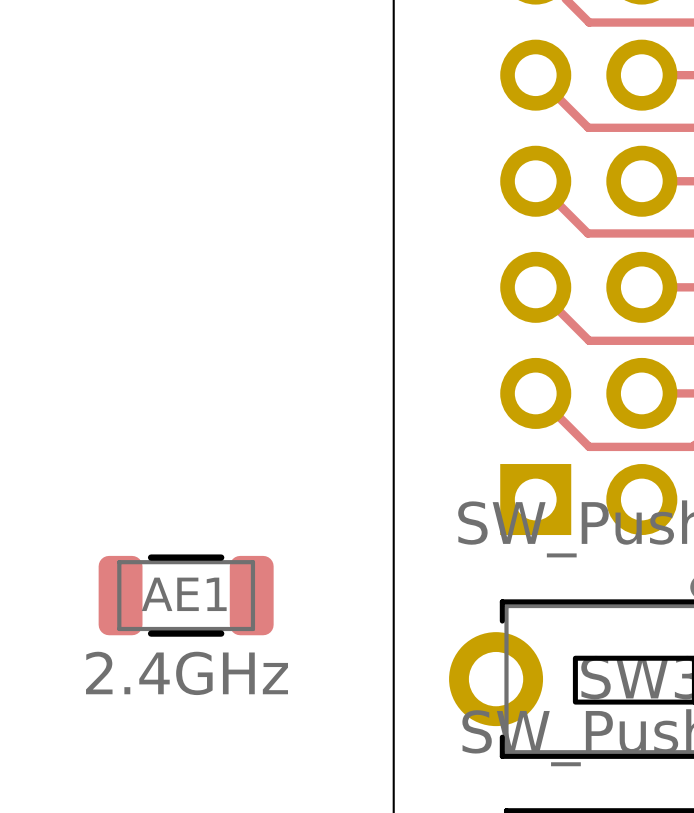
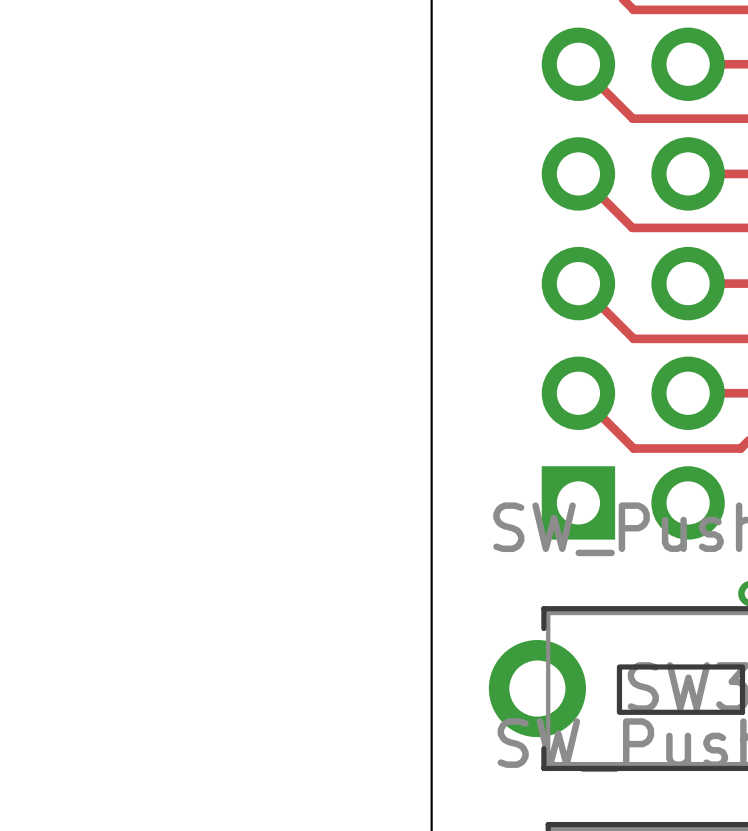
AE1: 2.4GHz (186, 595) -> none

